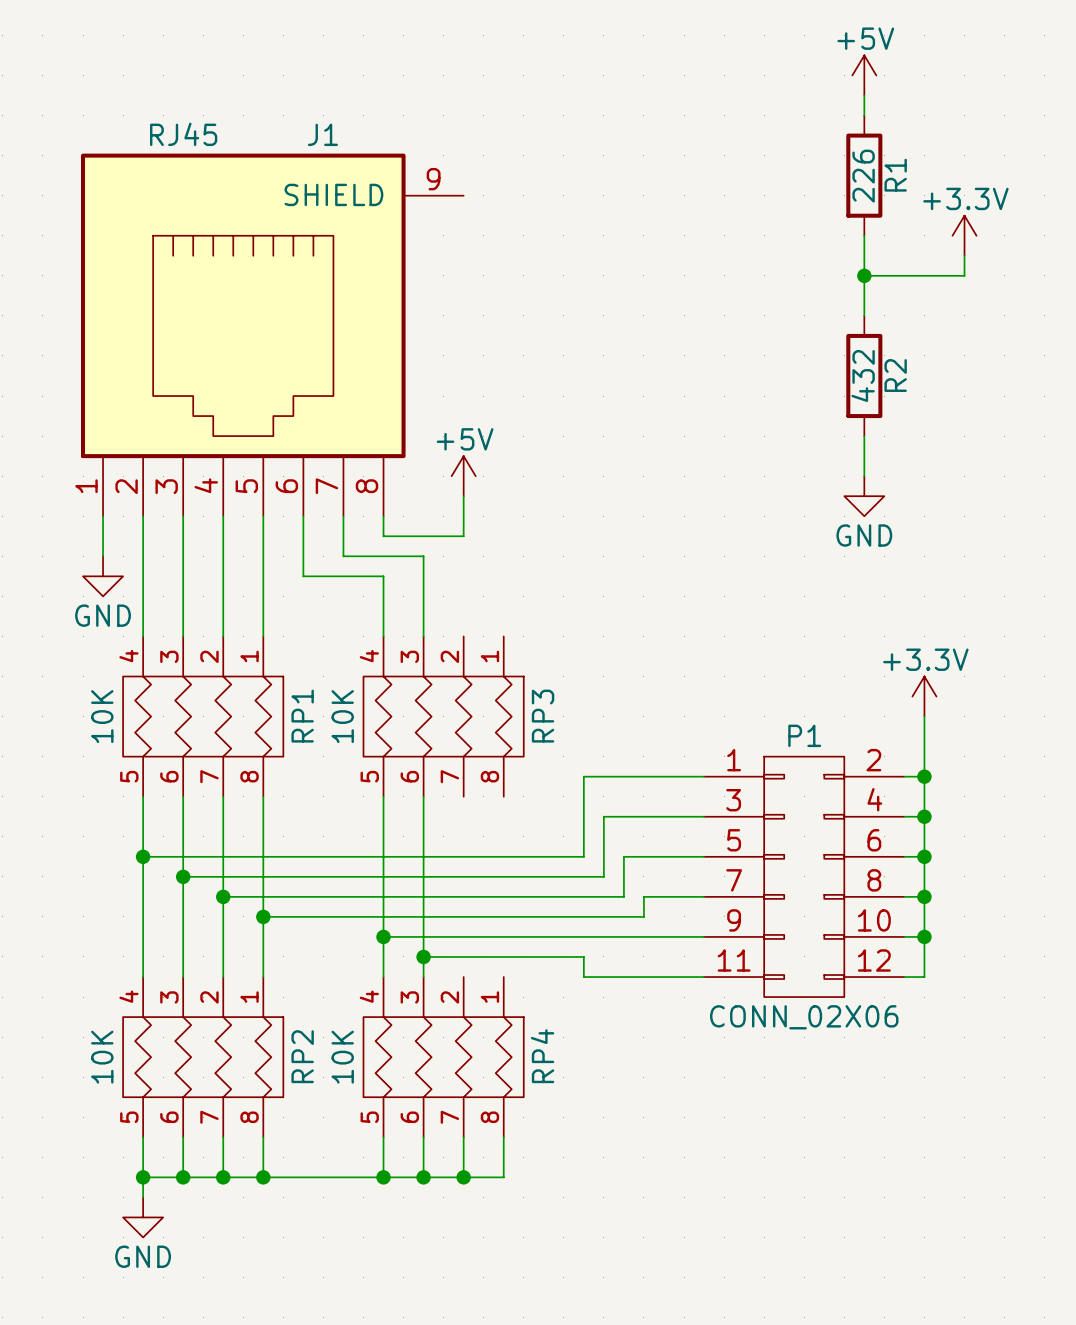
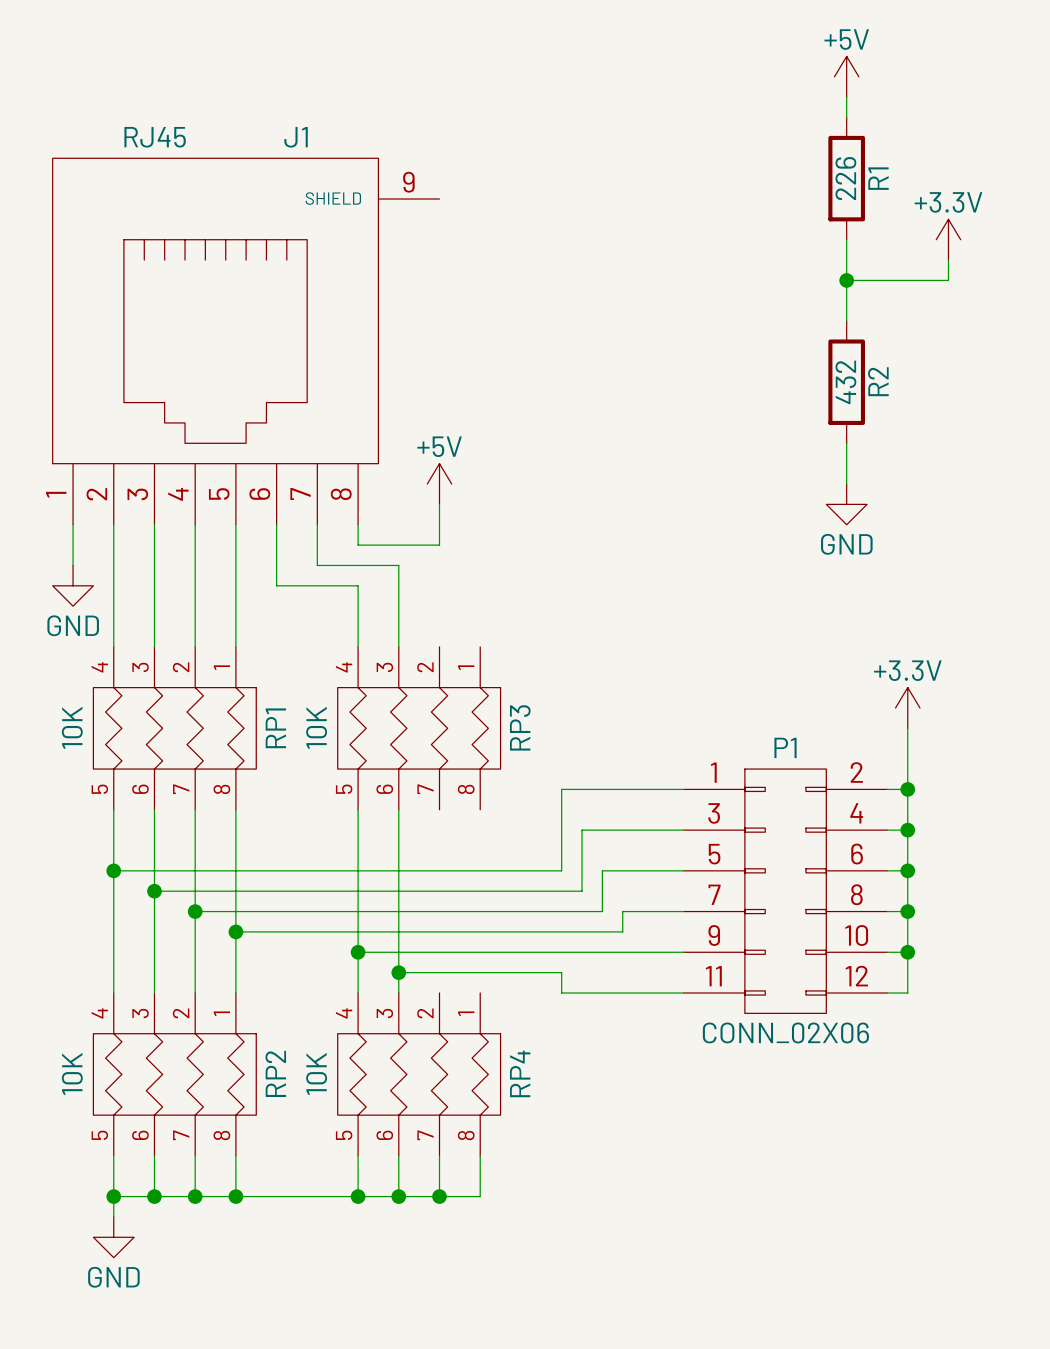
J1 symbol: [81, 153, 464, 517] -> [52, 158, 440, 525]

